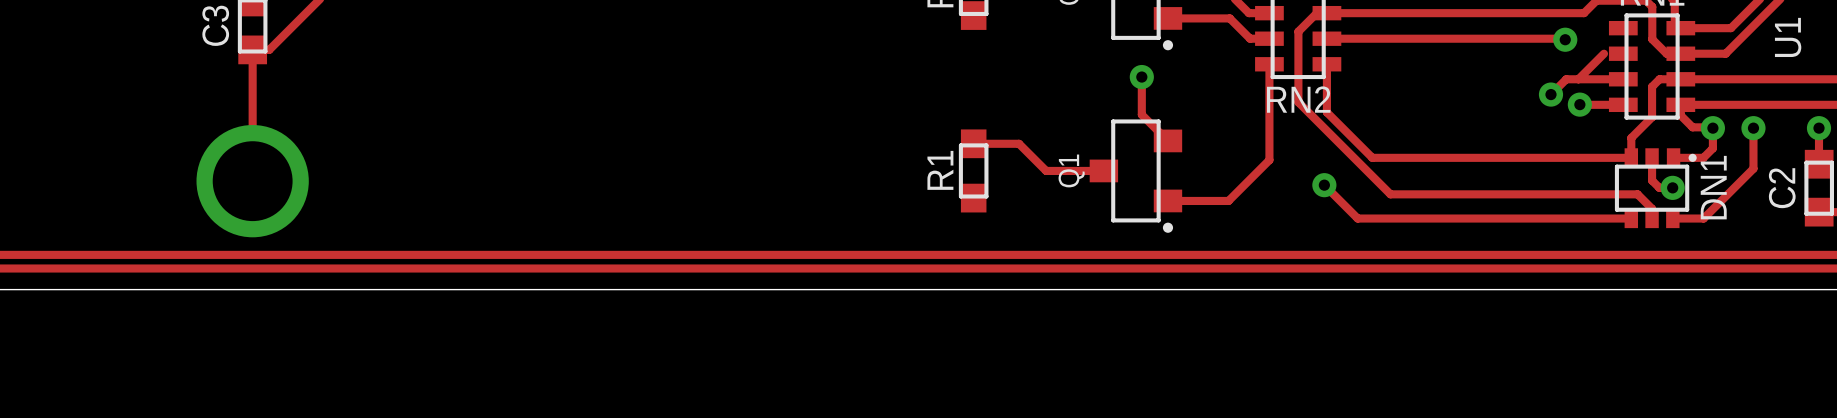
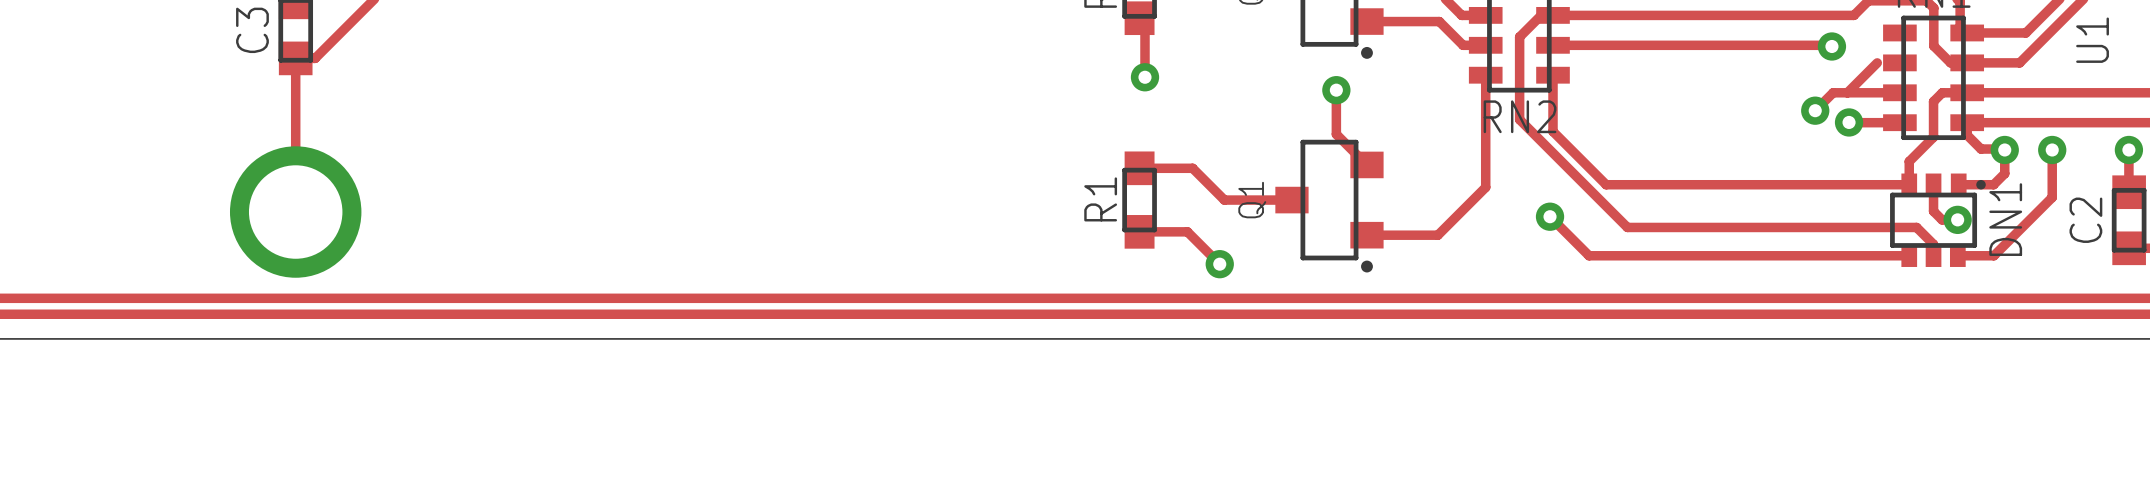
track: none -> (1139, 18) (1144, 23) (1144, 77)
via: none -> (1144, 77)
track: none -> (1139, 231) (1187, 231) (1219, 264)
via: none -> (1219, 264)

